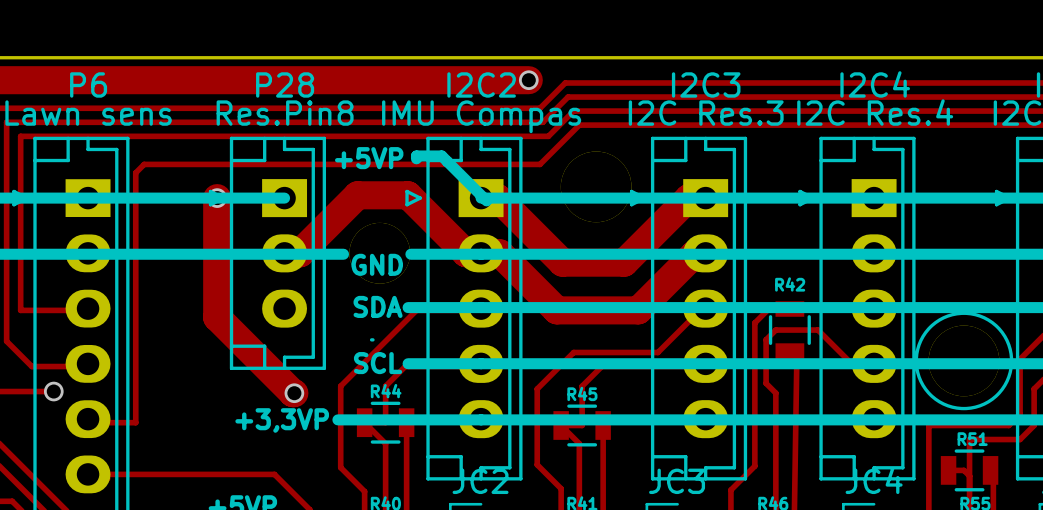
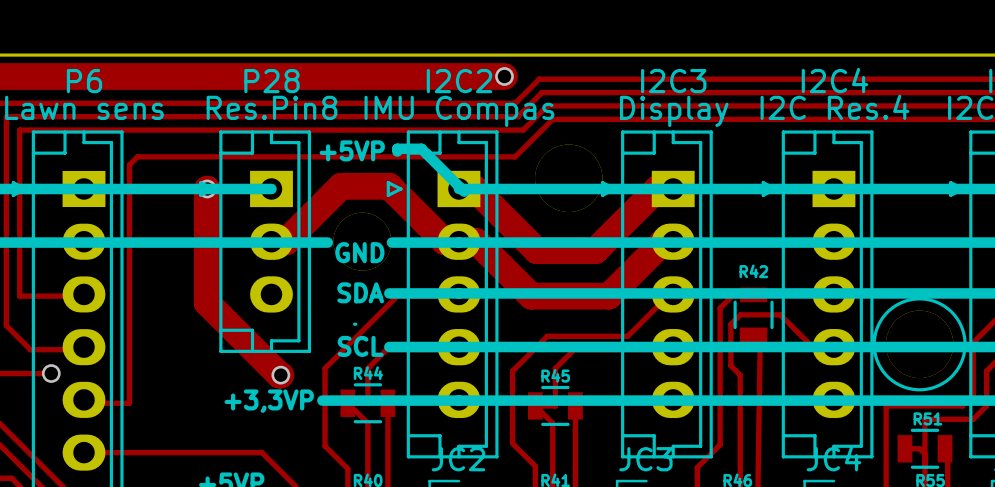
I2C3 value: I2C Res.3 (706, 113) -> Display (674, 111)

